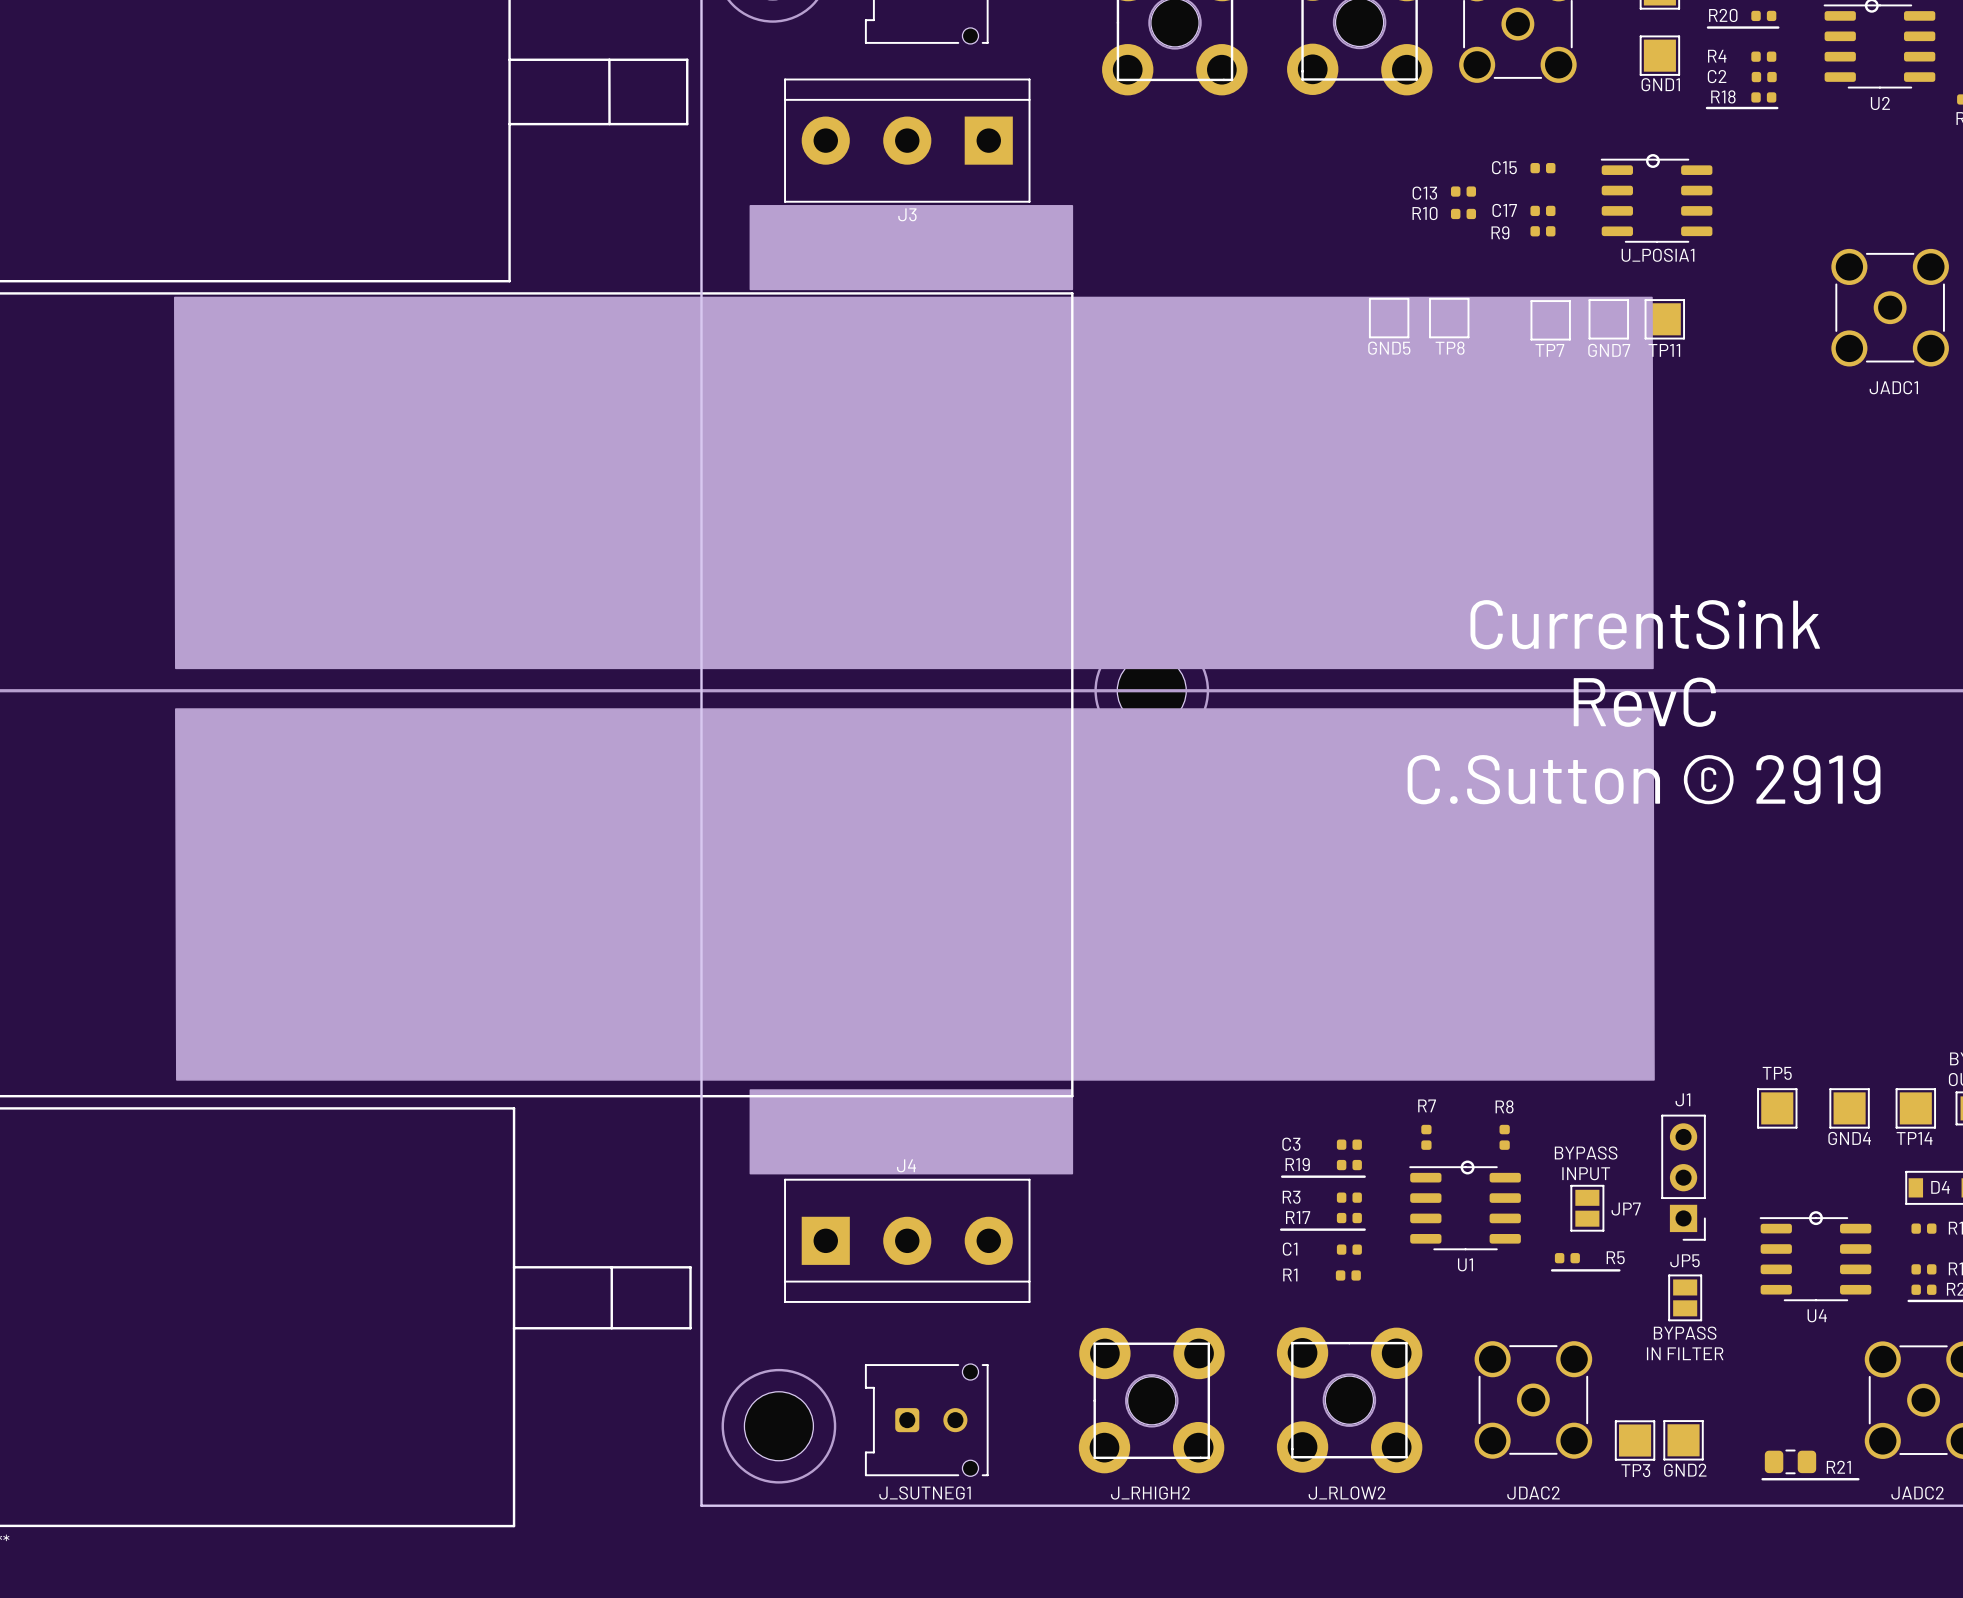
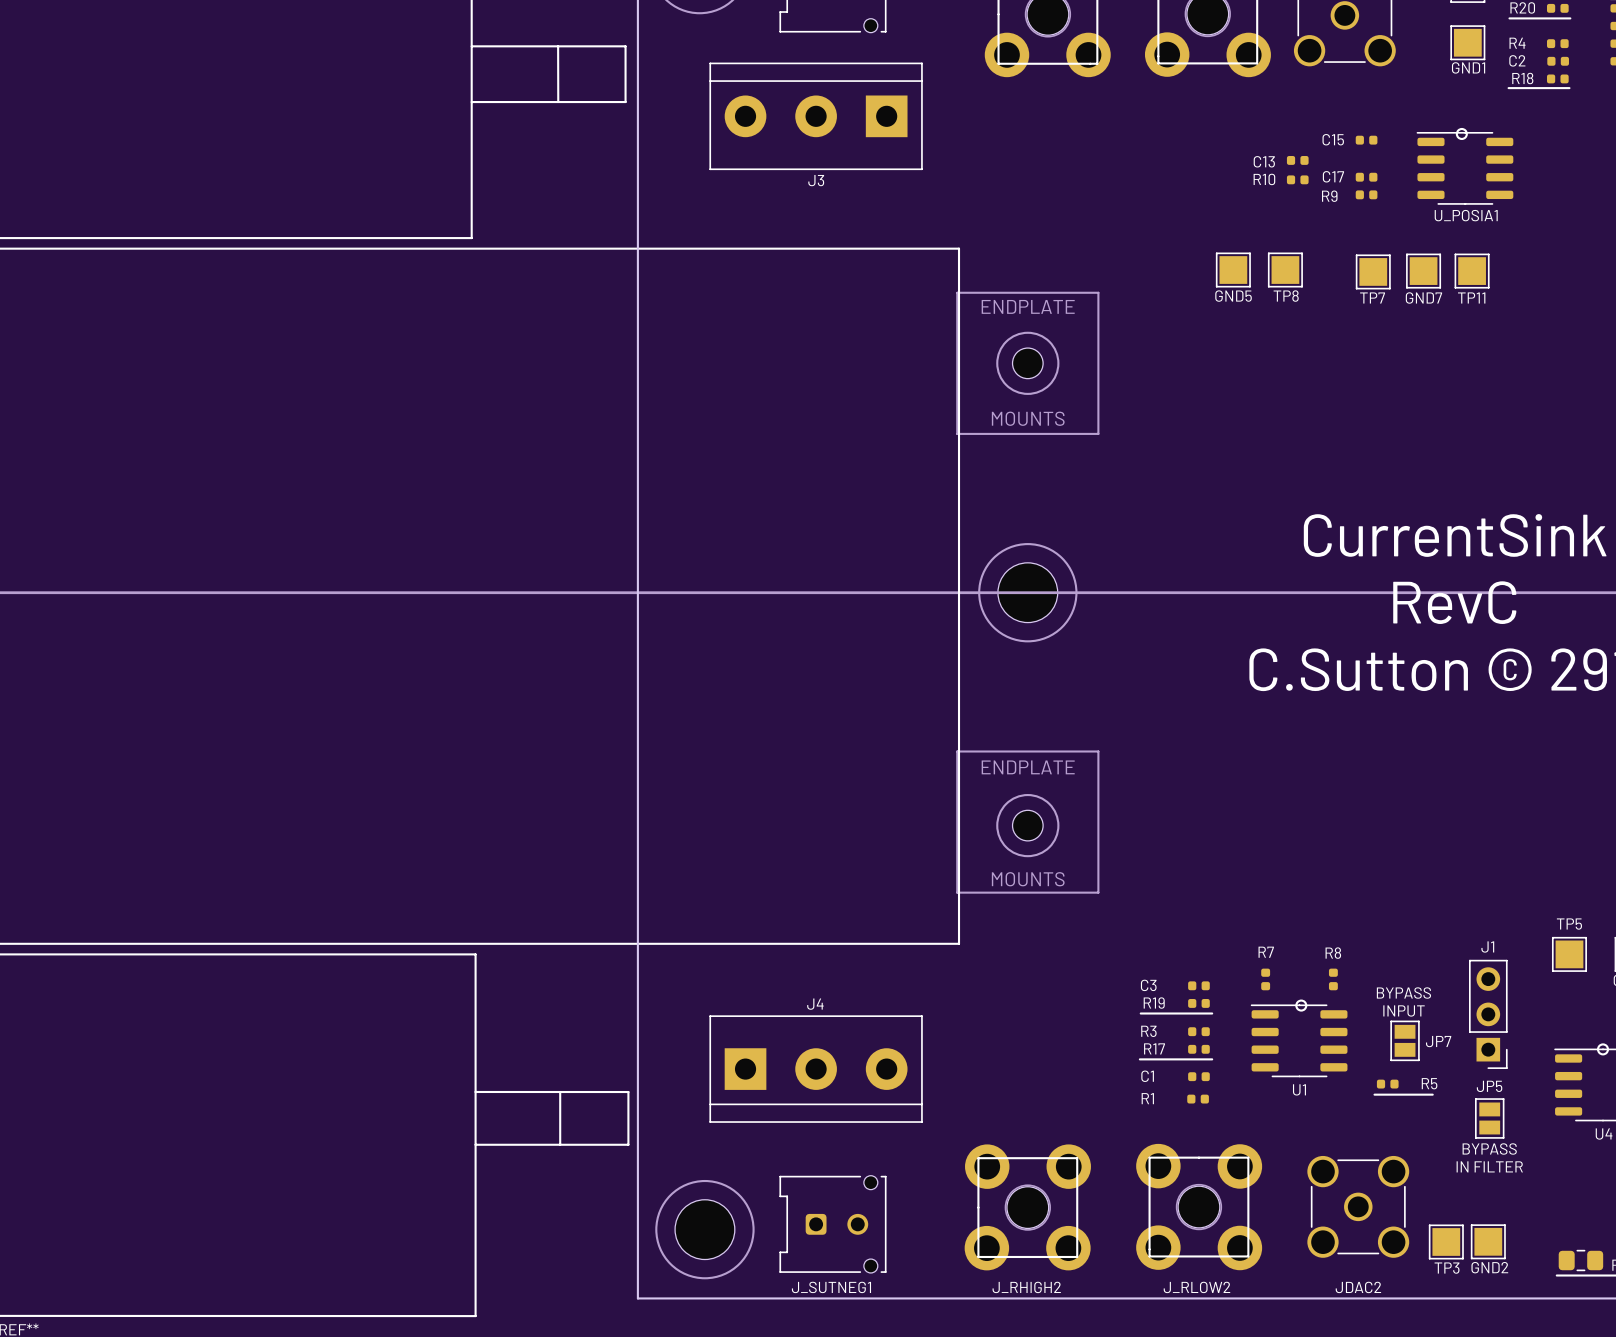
drawing: [174, 205, 1654, 670] -> none
drawing: [175, 708, 1655, 1175] -> none

